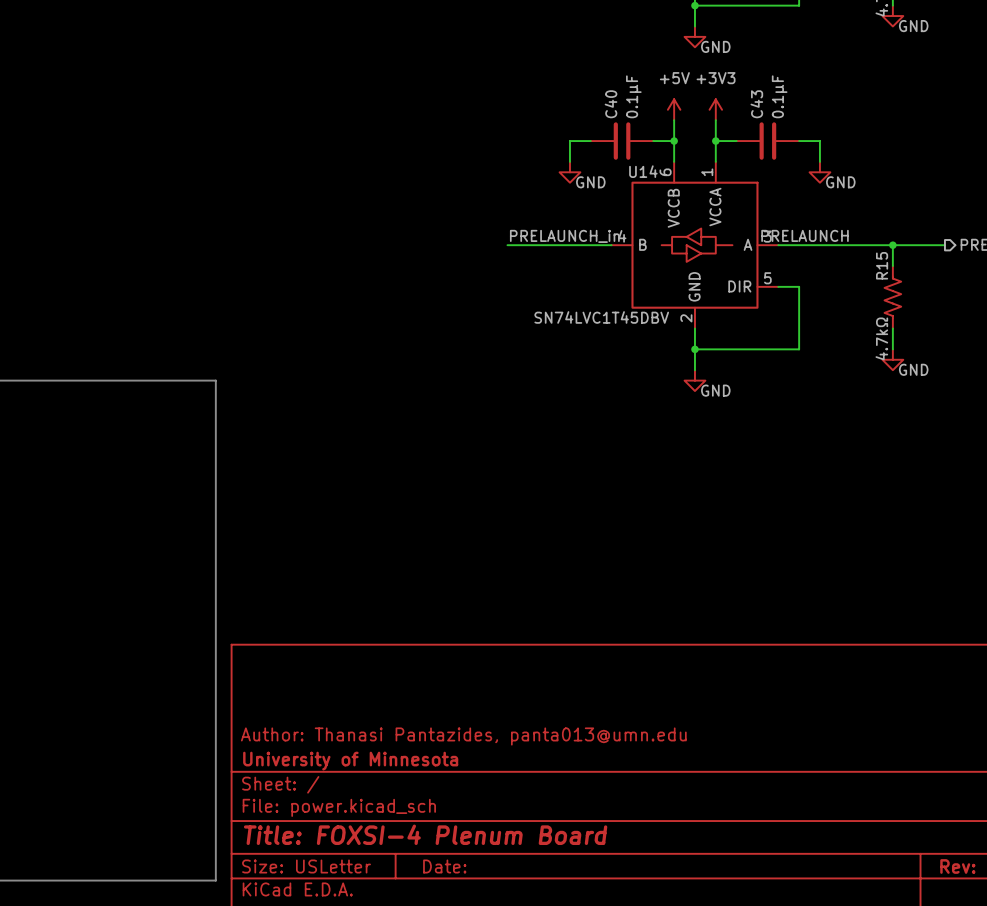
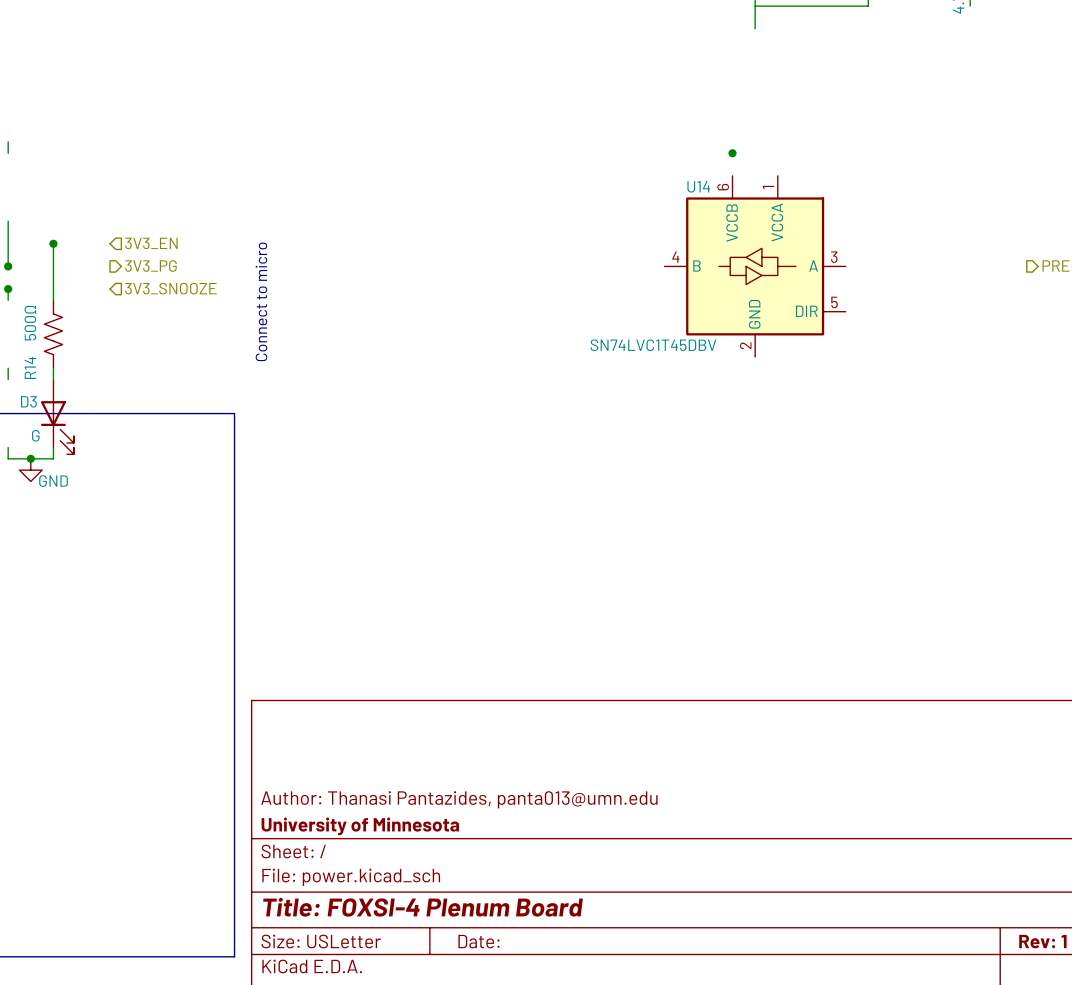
junction: (694, 5) -> none
power symbol: GND (892, 16) -> none
power symbol: GND (694, 36) -> none
power symbol: +5V (674, 109) -> none
power symbol: +3V3 (715, 109) -> none
wire: (674, 120) (674, 161) -> none
wire: (715, 120) (715, 161) -> none
wire: none -> (8, 141) (8, 153)
wire: (590, 141) (569, 141) (569, 161) -> none
C40: 0.1µF (622, 141) -> none
wire: (653, 141) (674, 141) -> none
wire: (715, 141) (736, 141) -> none
junction: (715, 141) -> none
C43: 0.1µF (767, 141) -> none
wire: (799, 141) (819, 141) (819, 161) -> none
power symbol: GND (569, 172) -> none
power symbol: GND (819, 172) -> none
wire: none -> (8, 221) (8, 266)
wire: none -> (53, 243) (53, 300)
junction: none -> (53, 243)
hierarchical label: none -> 3V3_EN (151, 243)
label: PRELAUNCH (805, 235) -> none
label: PRELAUNCH_in (564, 236) -> none
junction: none -> (8, 266)
hierarchical label: none -> 3V3_PG (150, 266)
wire: (507, 245) (611, 245) -> none
wire: (778, 245) (944, 245) -> none
wire: (892, 245) (892, 266) -> none
junction: (892, 245) -> none
wire: none -> (8, 289) (8, 300)
junction: none -> (8, 289)
hierarchical label: none -> 3V3_SNOOZE (170, 288)
wire: (778, 286) (799, 286) (799, 349) (694, 349) -> none
text: none -> Connect to micro (261, 301)
R15: 4.7kΩ (892, 297) -> none
R14: none -> 500Ω (53, 334)
wire: (694, 328) (694, 370) -> none
wire: (892, 328) (892, 349) -> none
wire: none -> (8, 368) (8, 379)
wire: none -> (53, 368) (53, 379)
junction: (694, 349) -> none
power symbol: GND (892, 359) -> none
power symbol: GND (694, 380) -> none
D3: none -> G (57, 416)
wire: none -> (8, 447) (8, 458) (53, 458) (53, 447)
junction: none -> (30, 458)
power symbol: none -> GND (30, 470)

